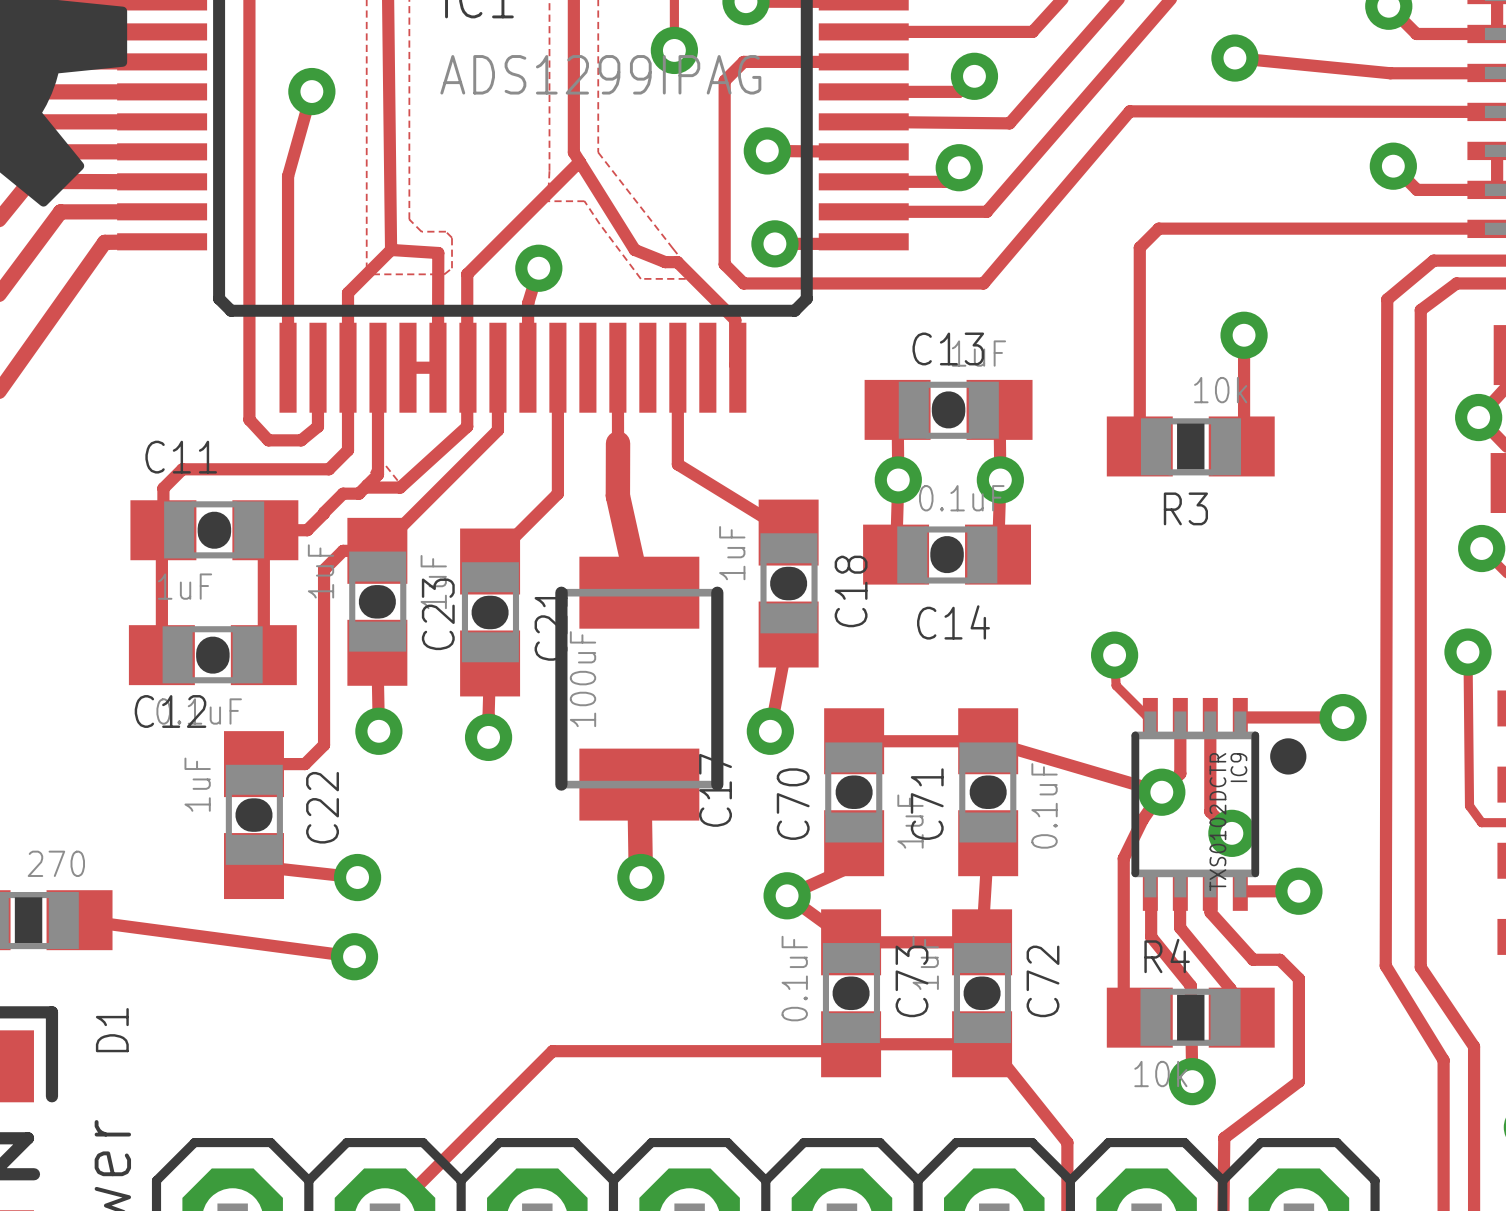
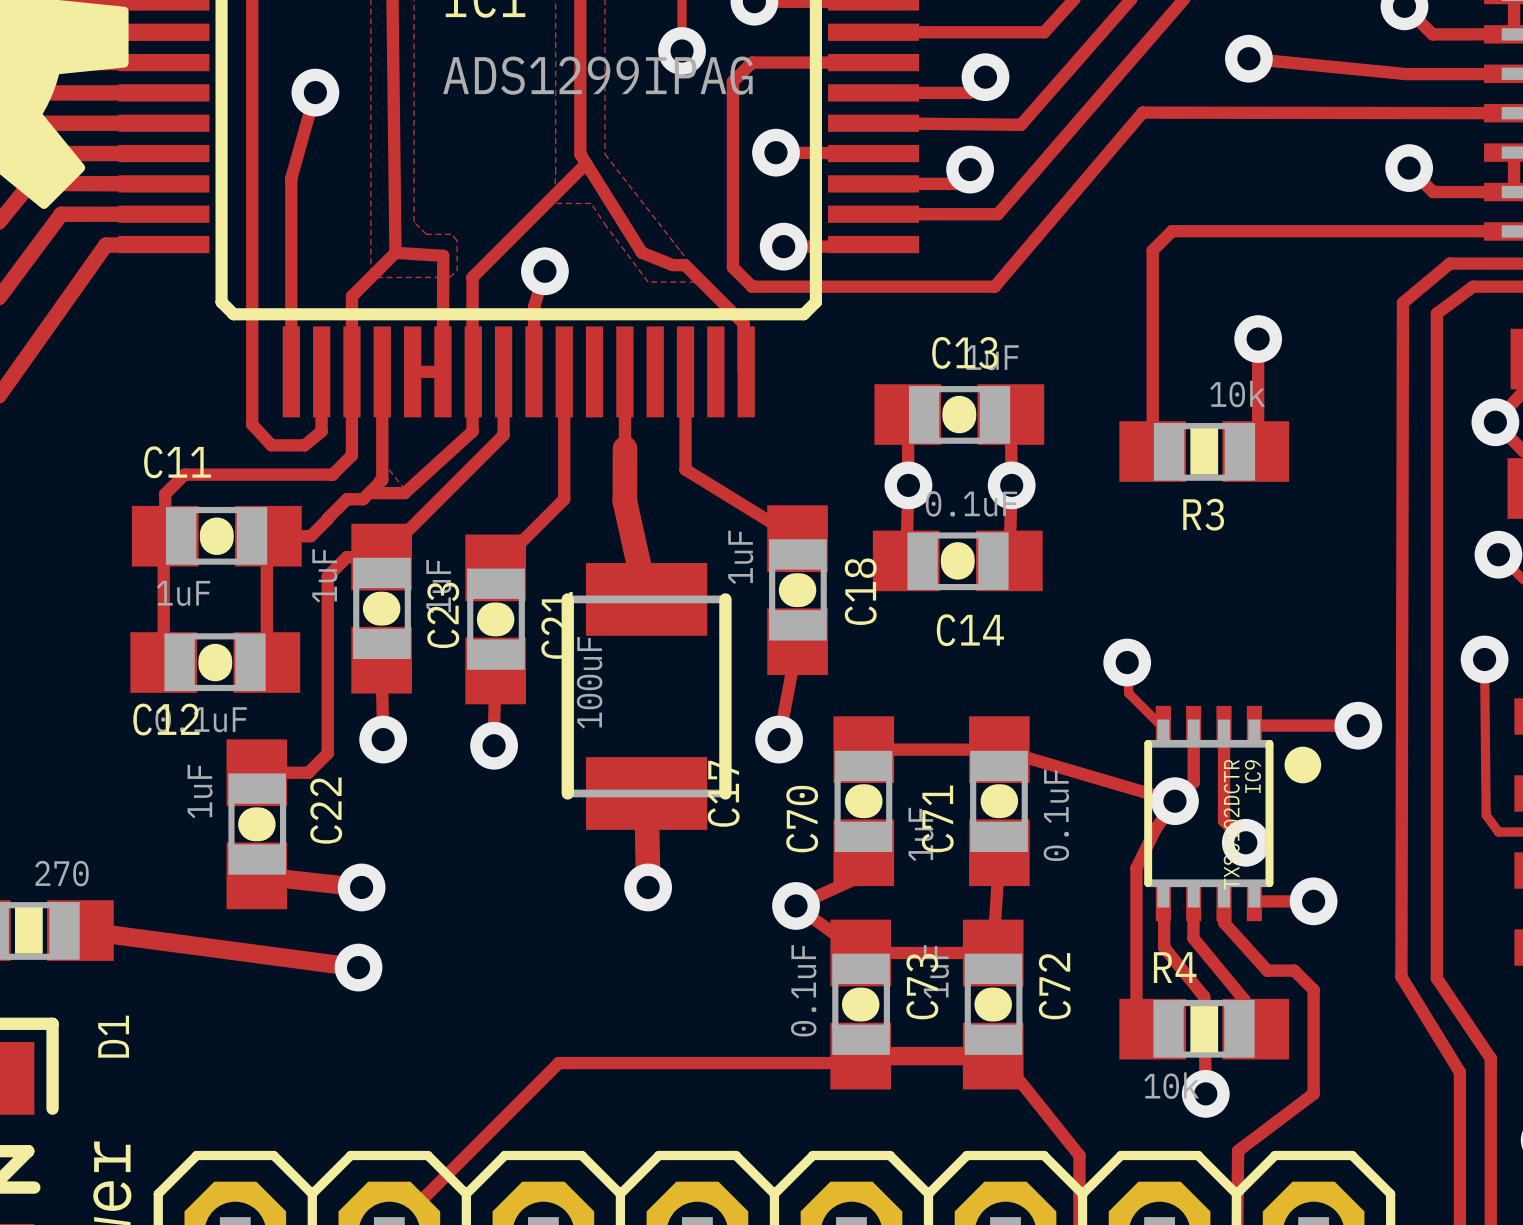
track width: thin (253, 866) (357, 877) -> thick (256, 875) (361, 887)
track width: thin (79, 920) (354, 956) -> thick (80, 930) (358, 967)
track width: thin (851, 1044) (982, 1044) -> thick (860, 1056) (993, 1056)

